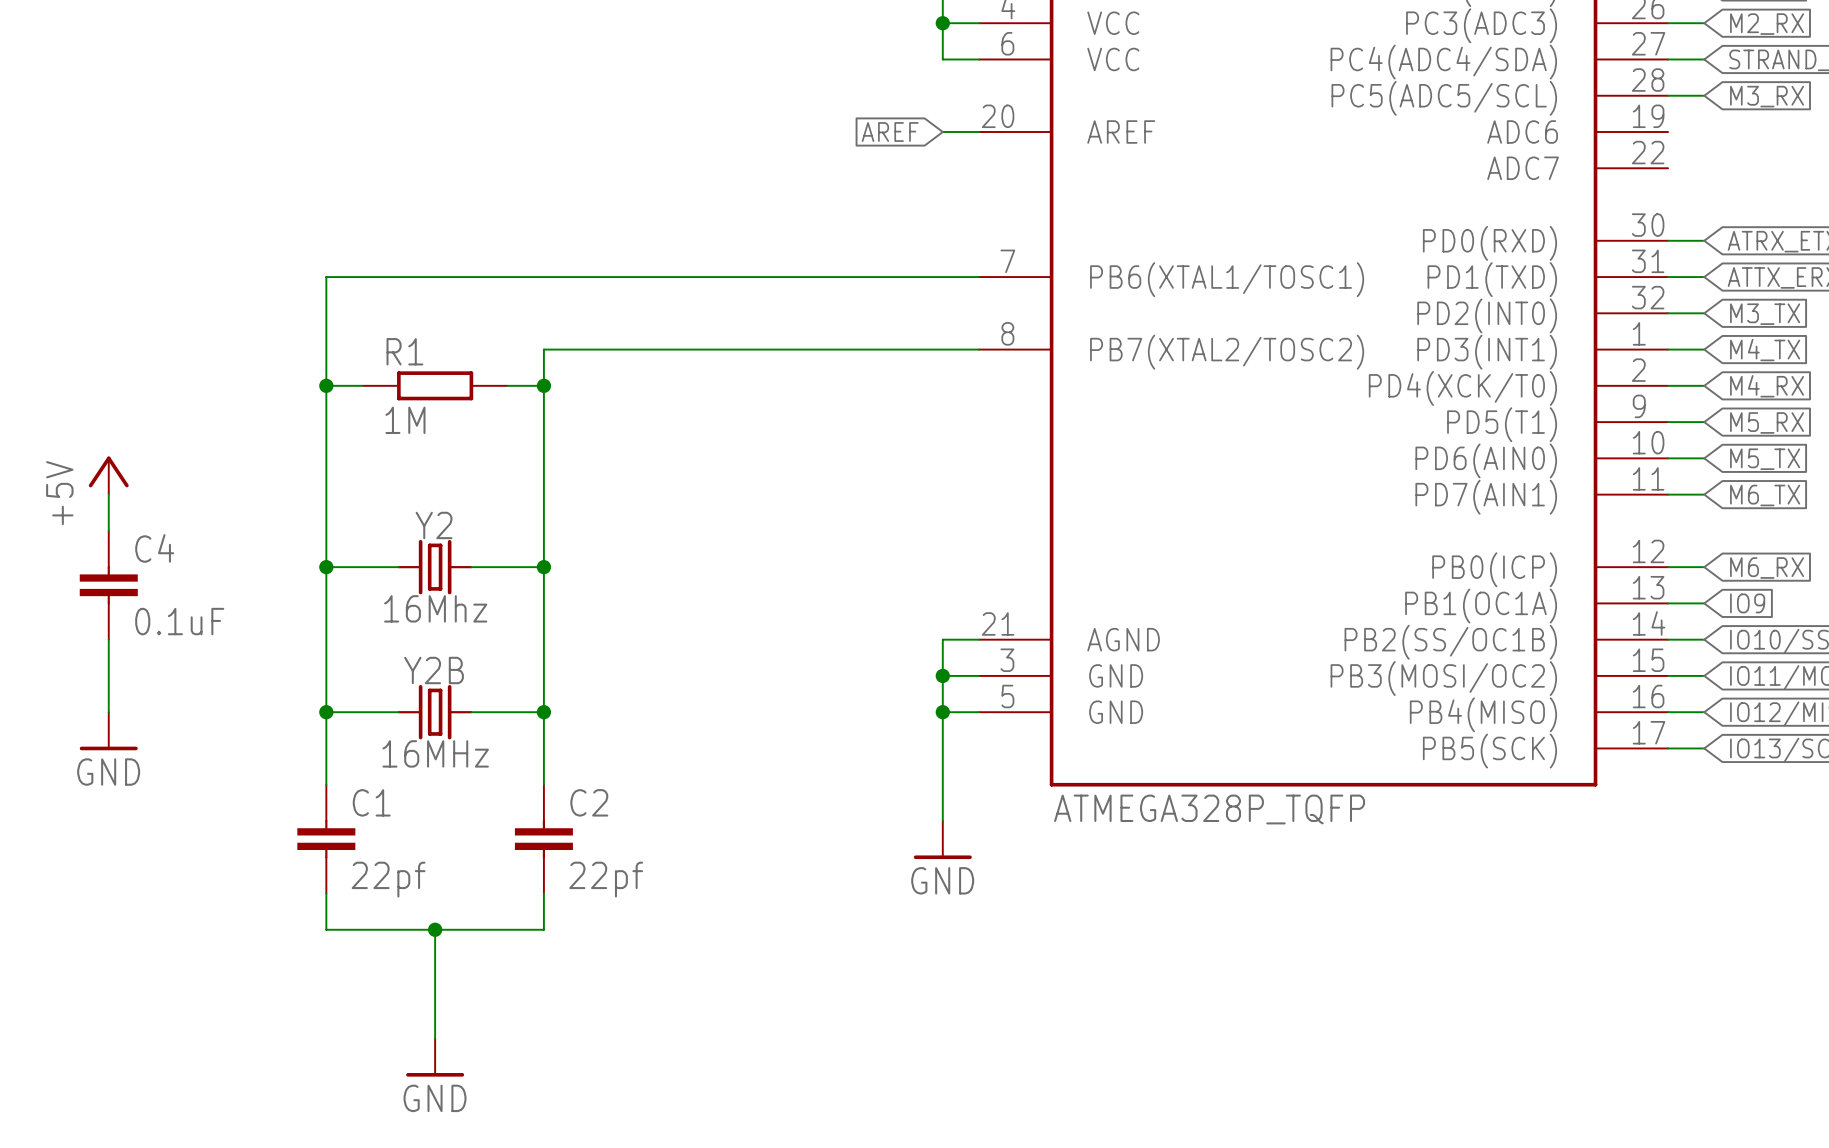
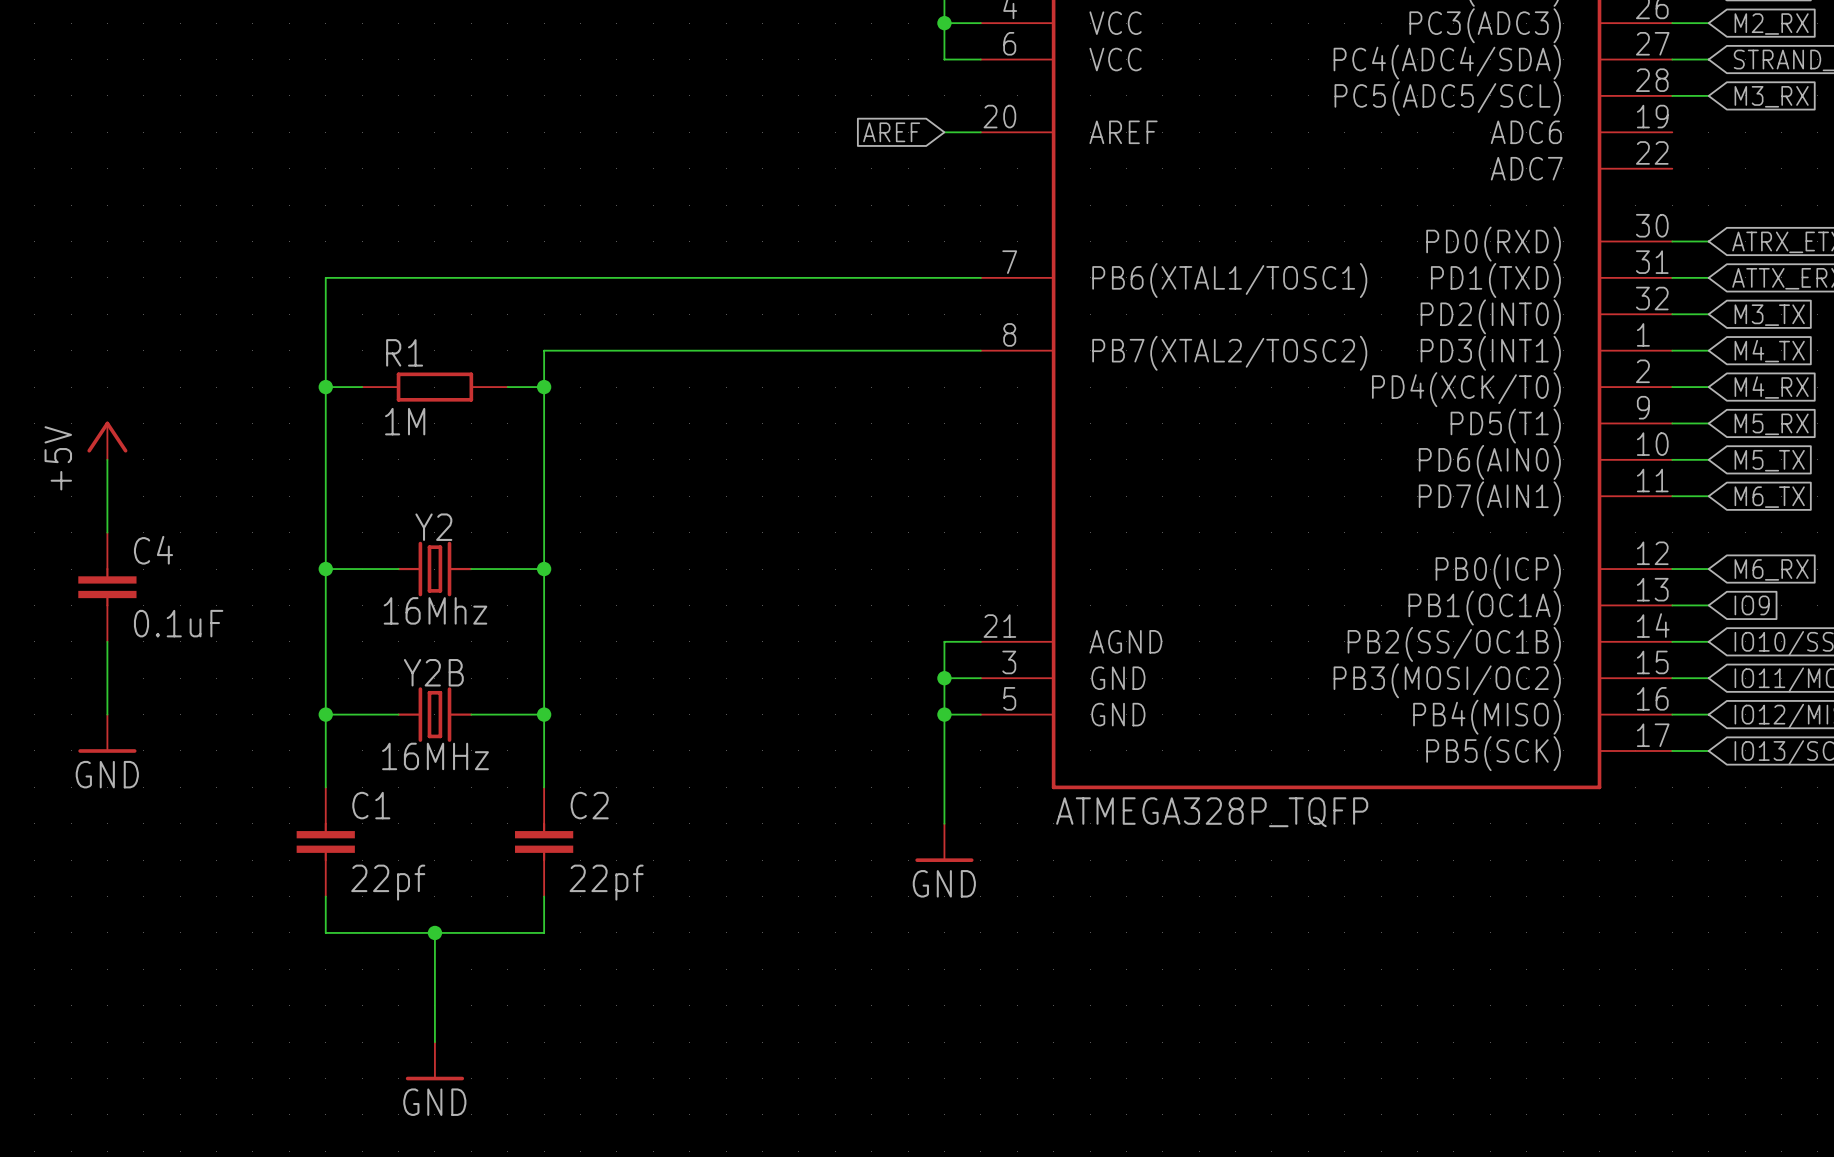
power symbol position: +5V (108, 475) -> +5V (107, 440)

